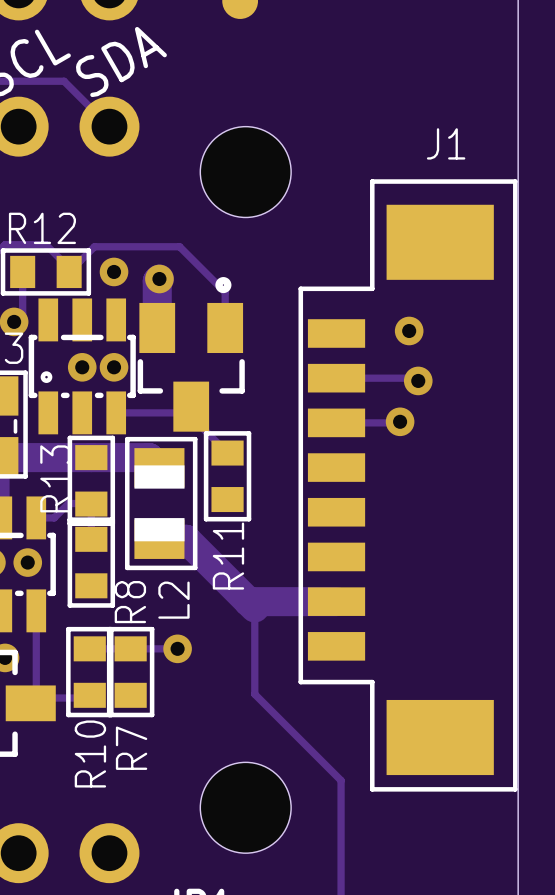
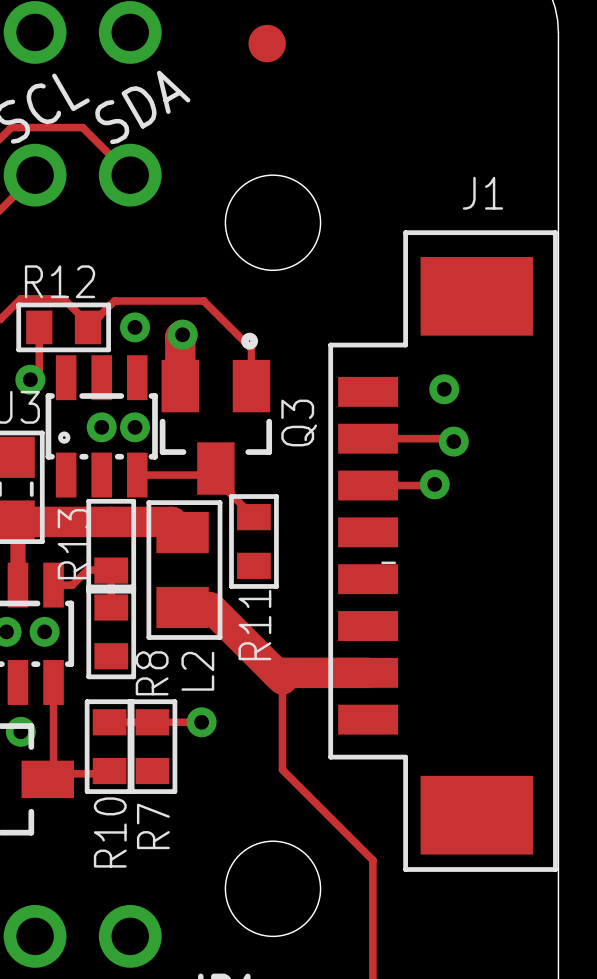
Q3 name: none -> Q3 (299, 423)
L2 footprint: [124, 436, 198, 571] -> [146, 500, 223, 640]
drawing: none -> [381, 561, 396, 564]

